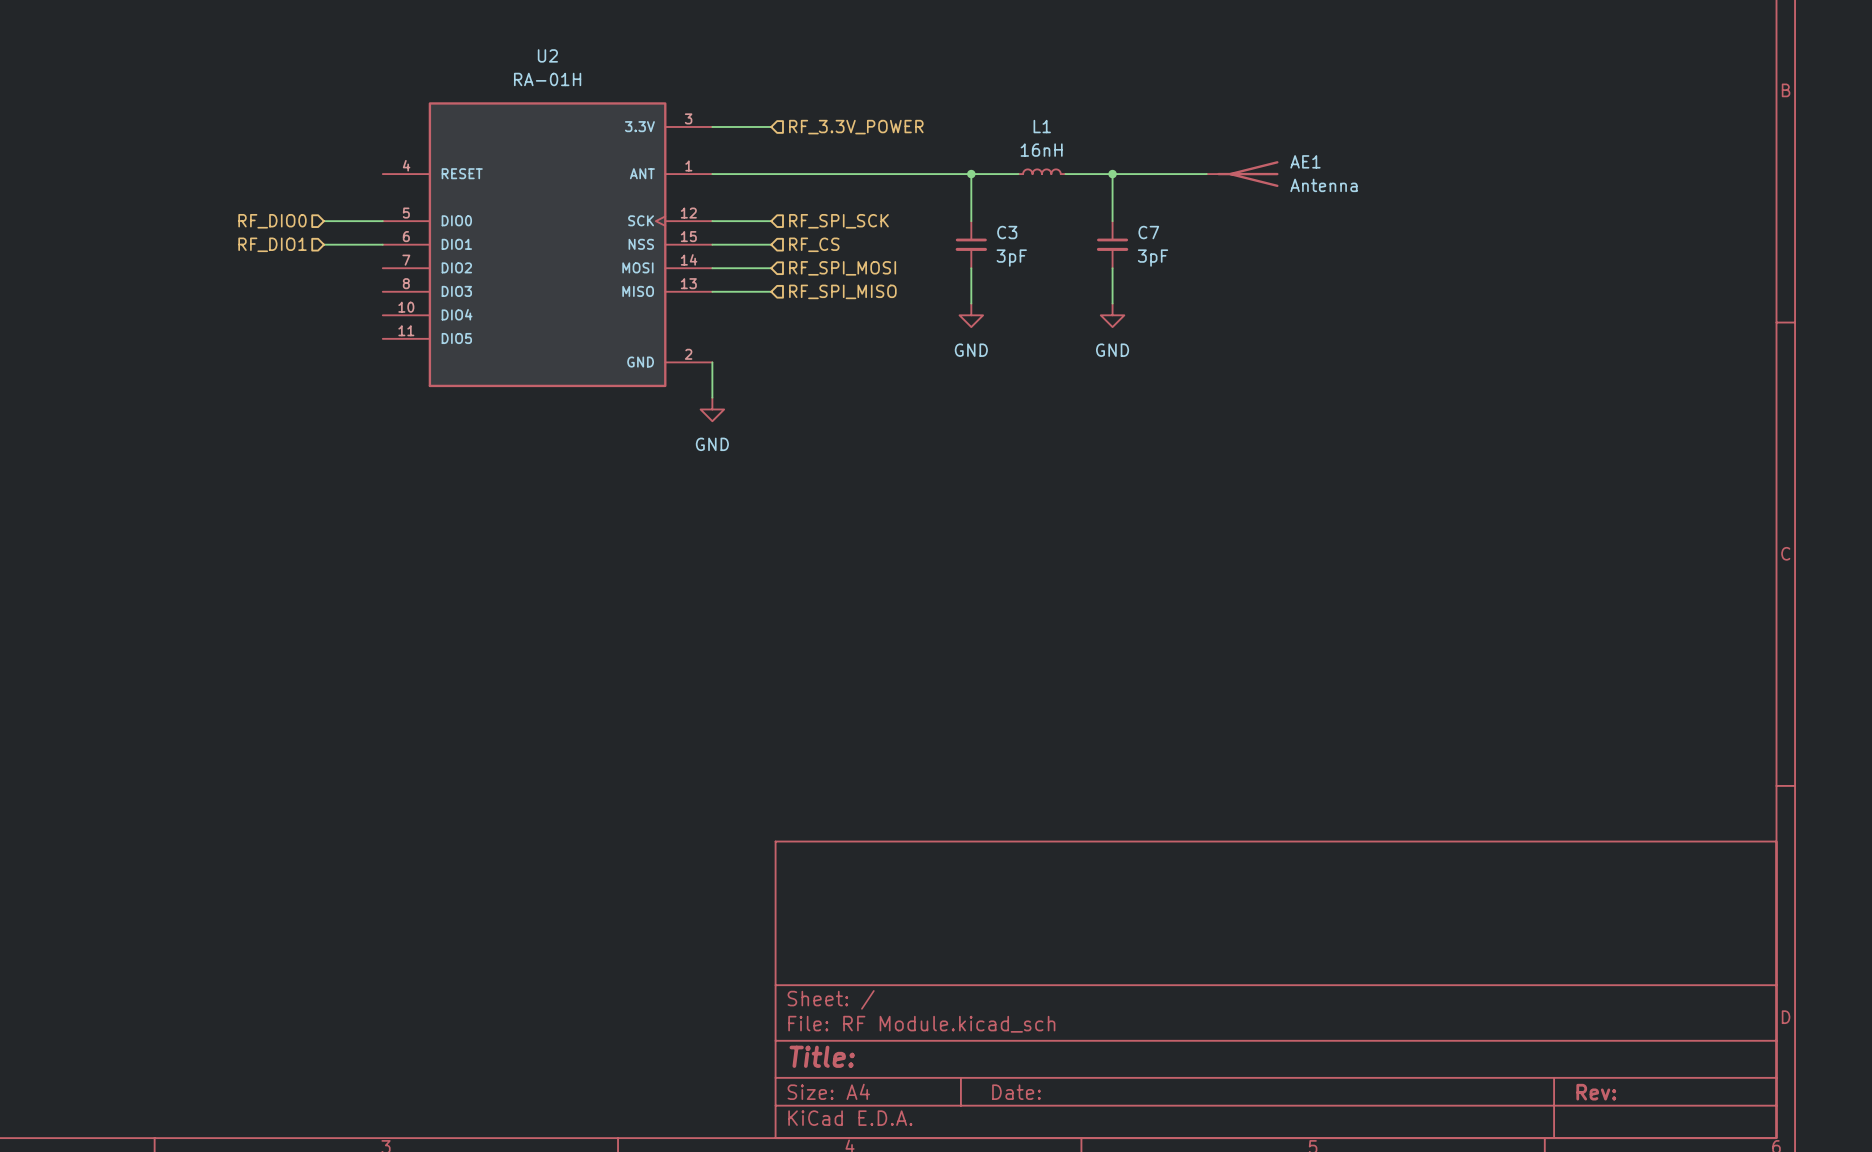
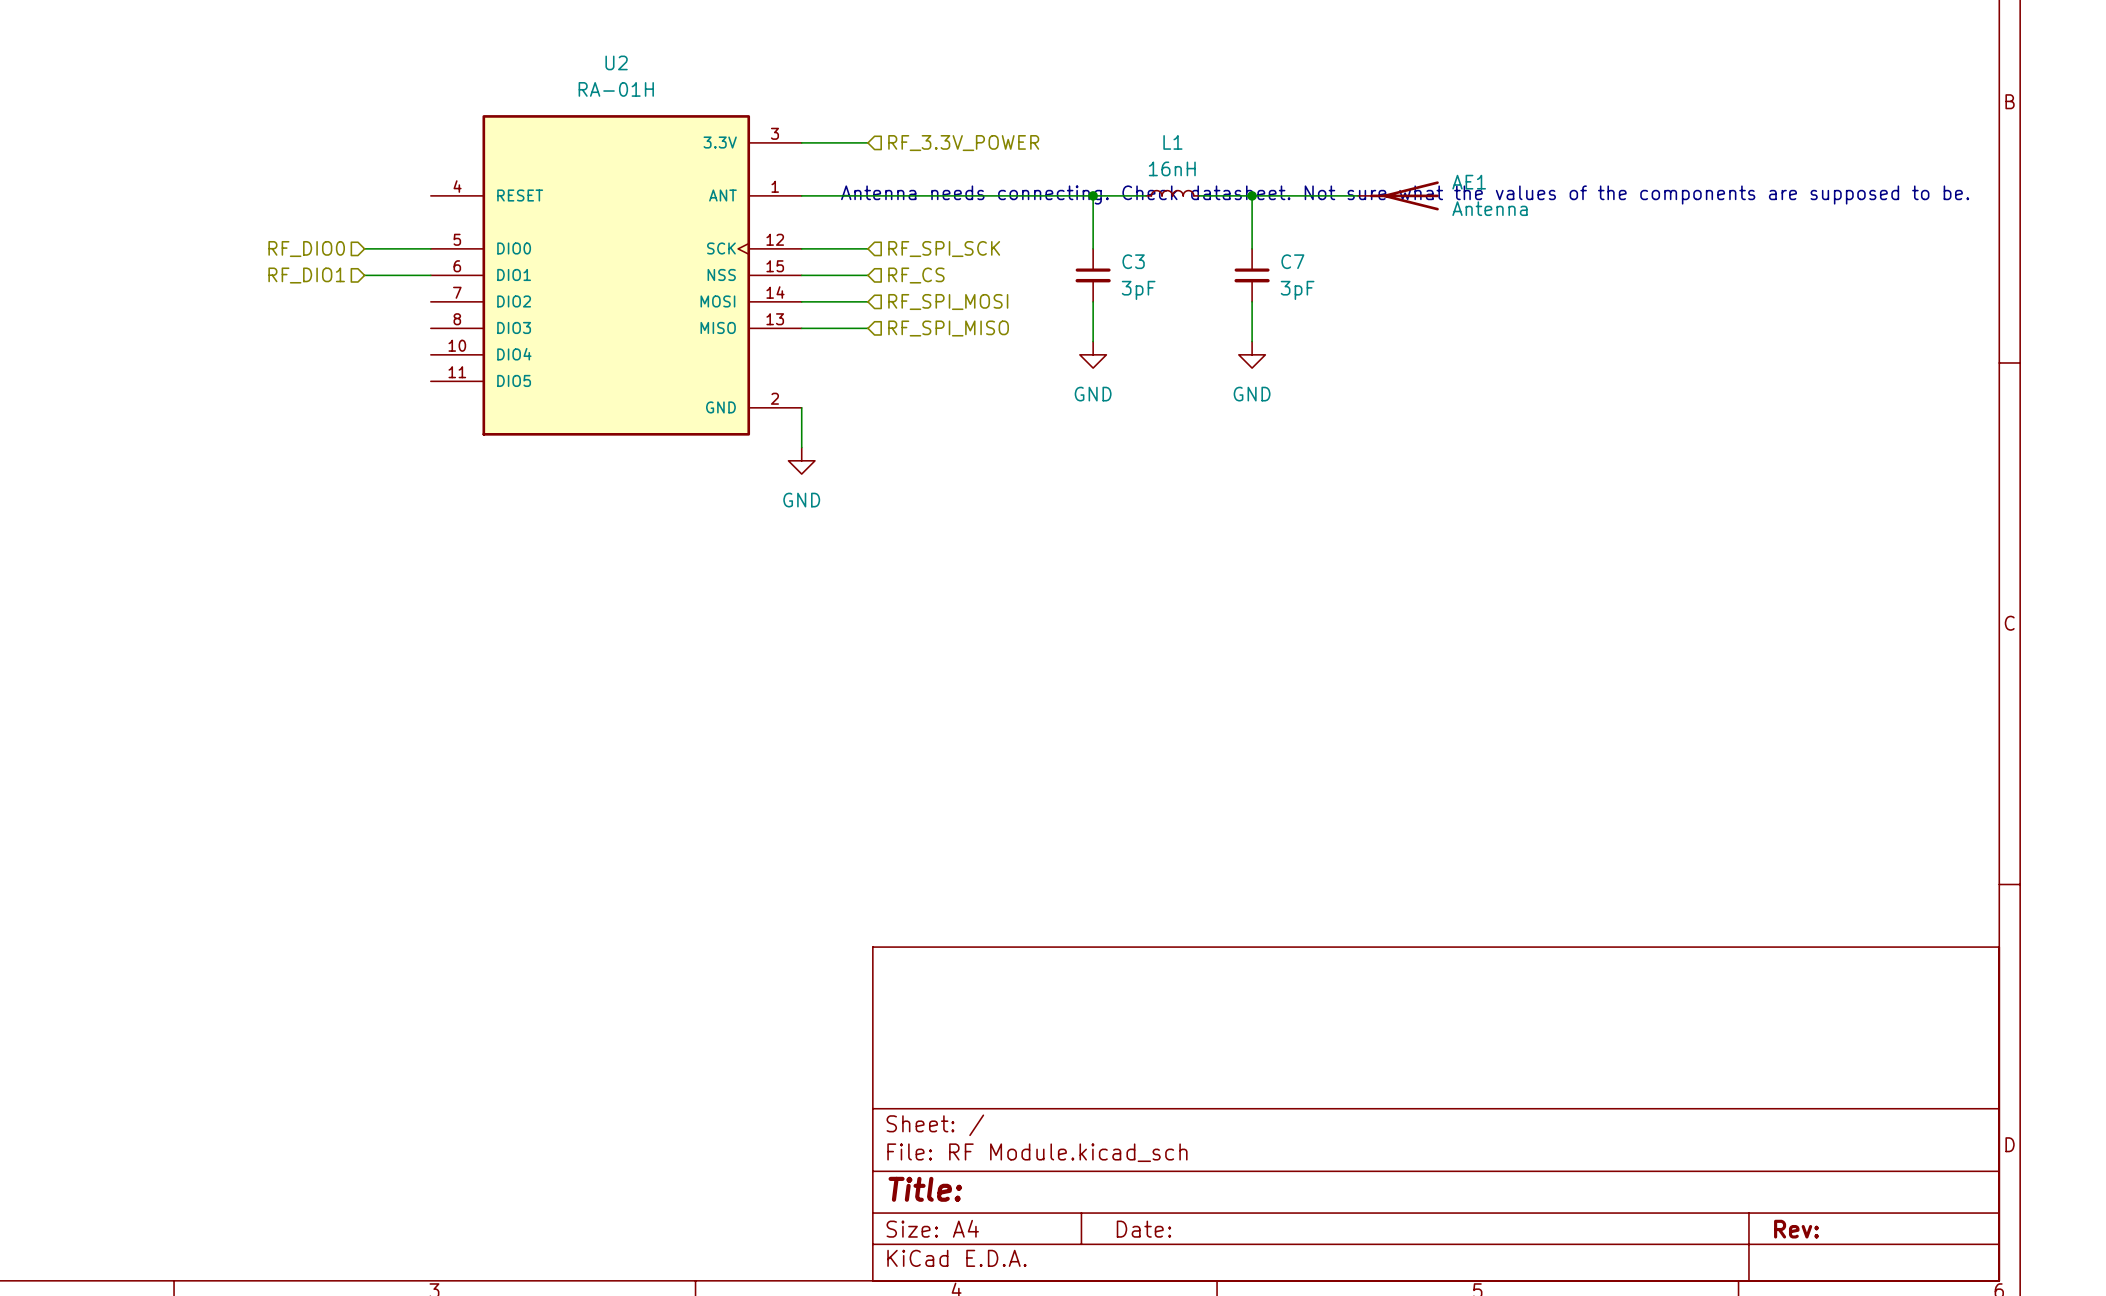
text: none -> Antenna needs connecting. Check datasheet. Not sure what the values of the components are supposed to be. (1405, 195)

